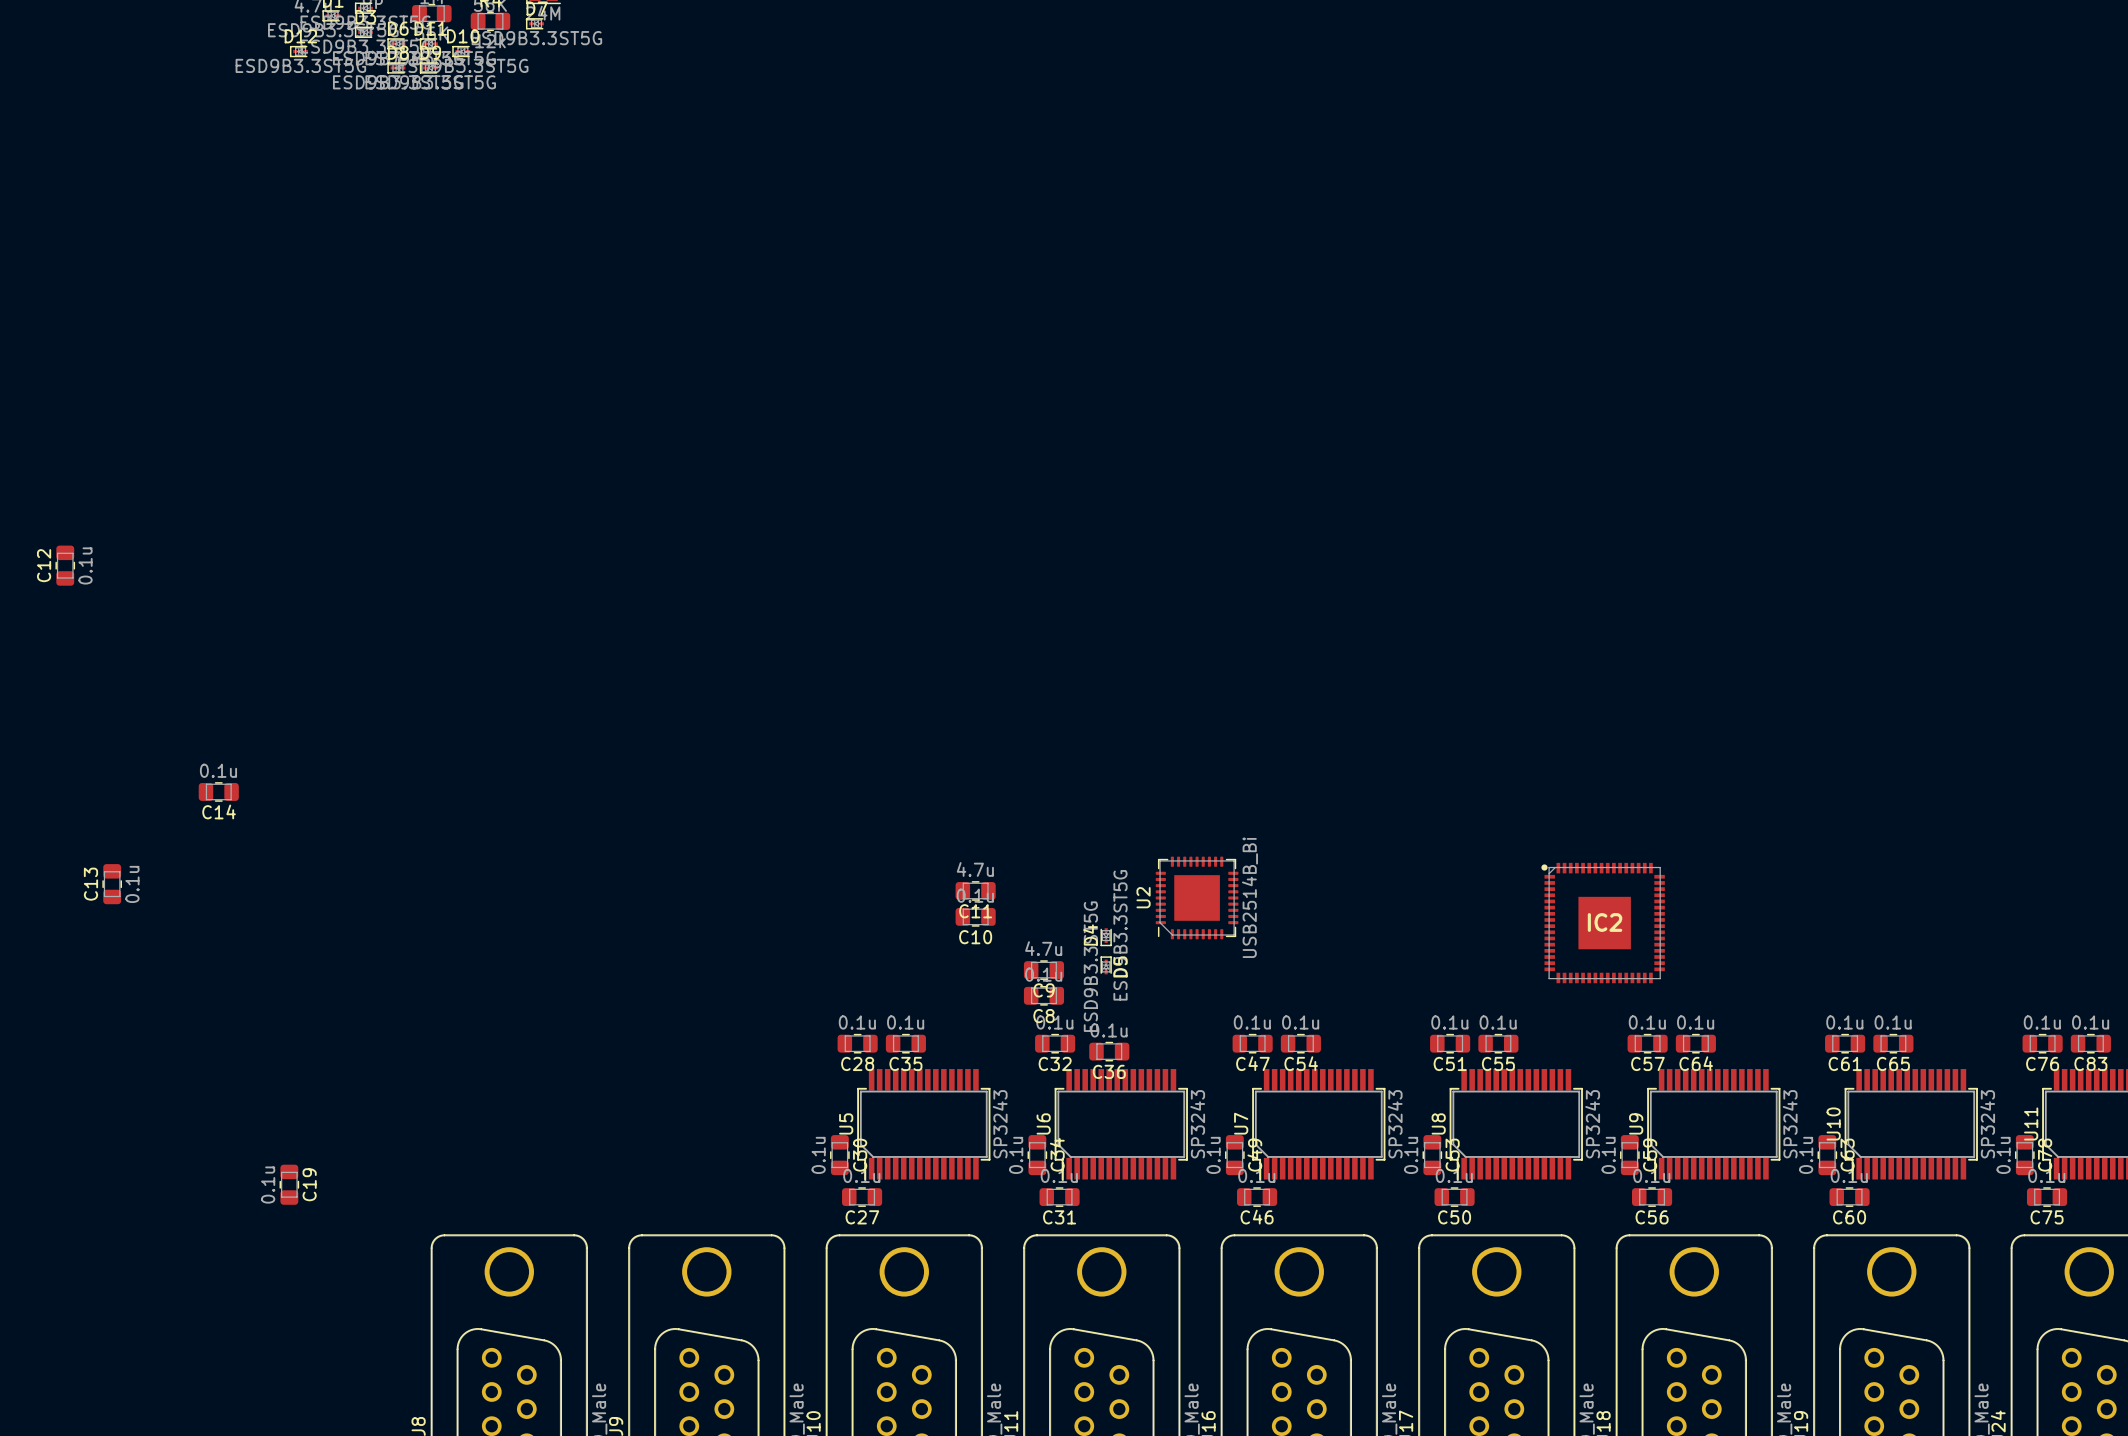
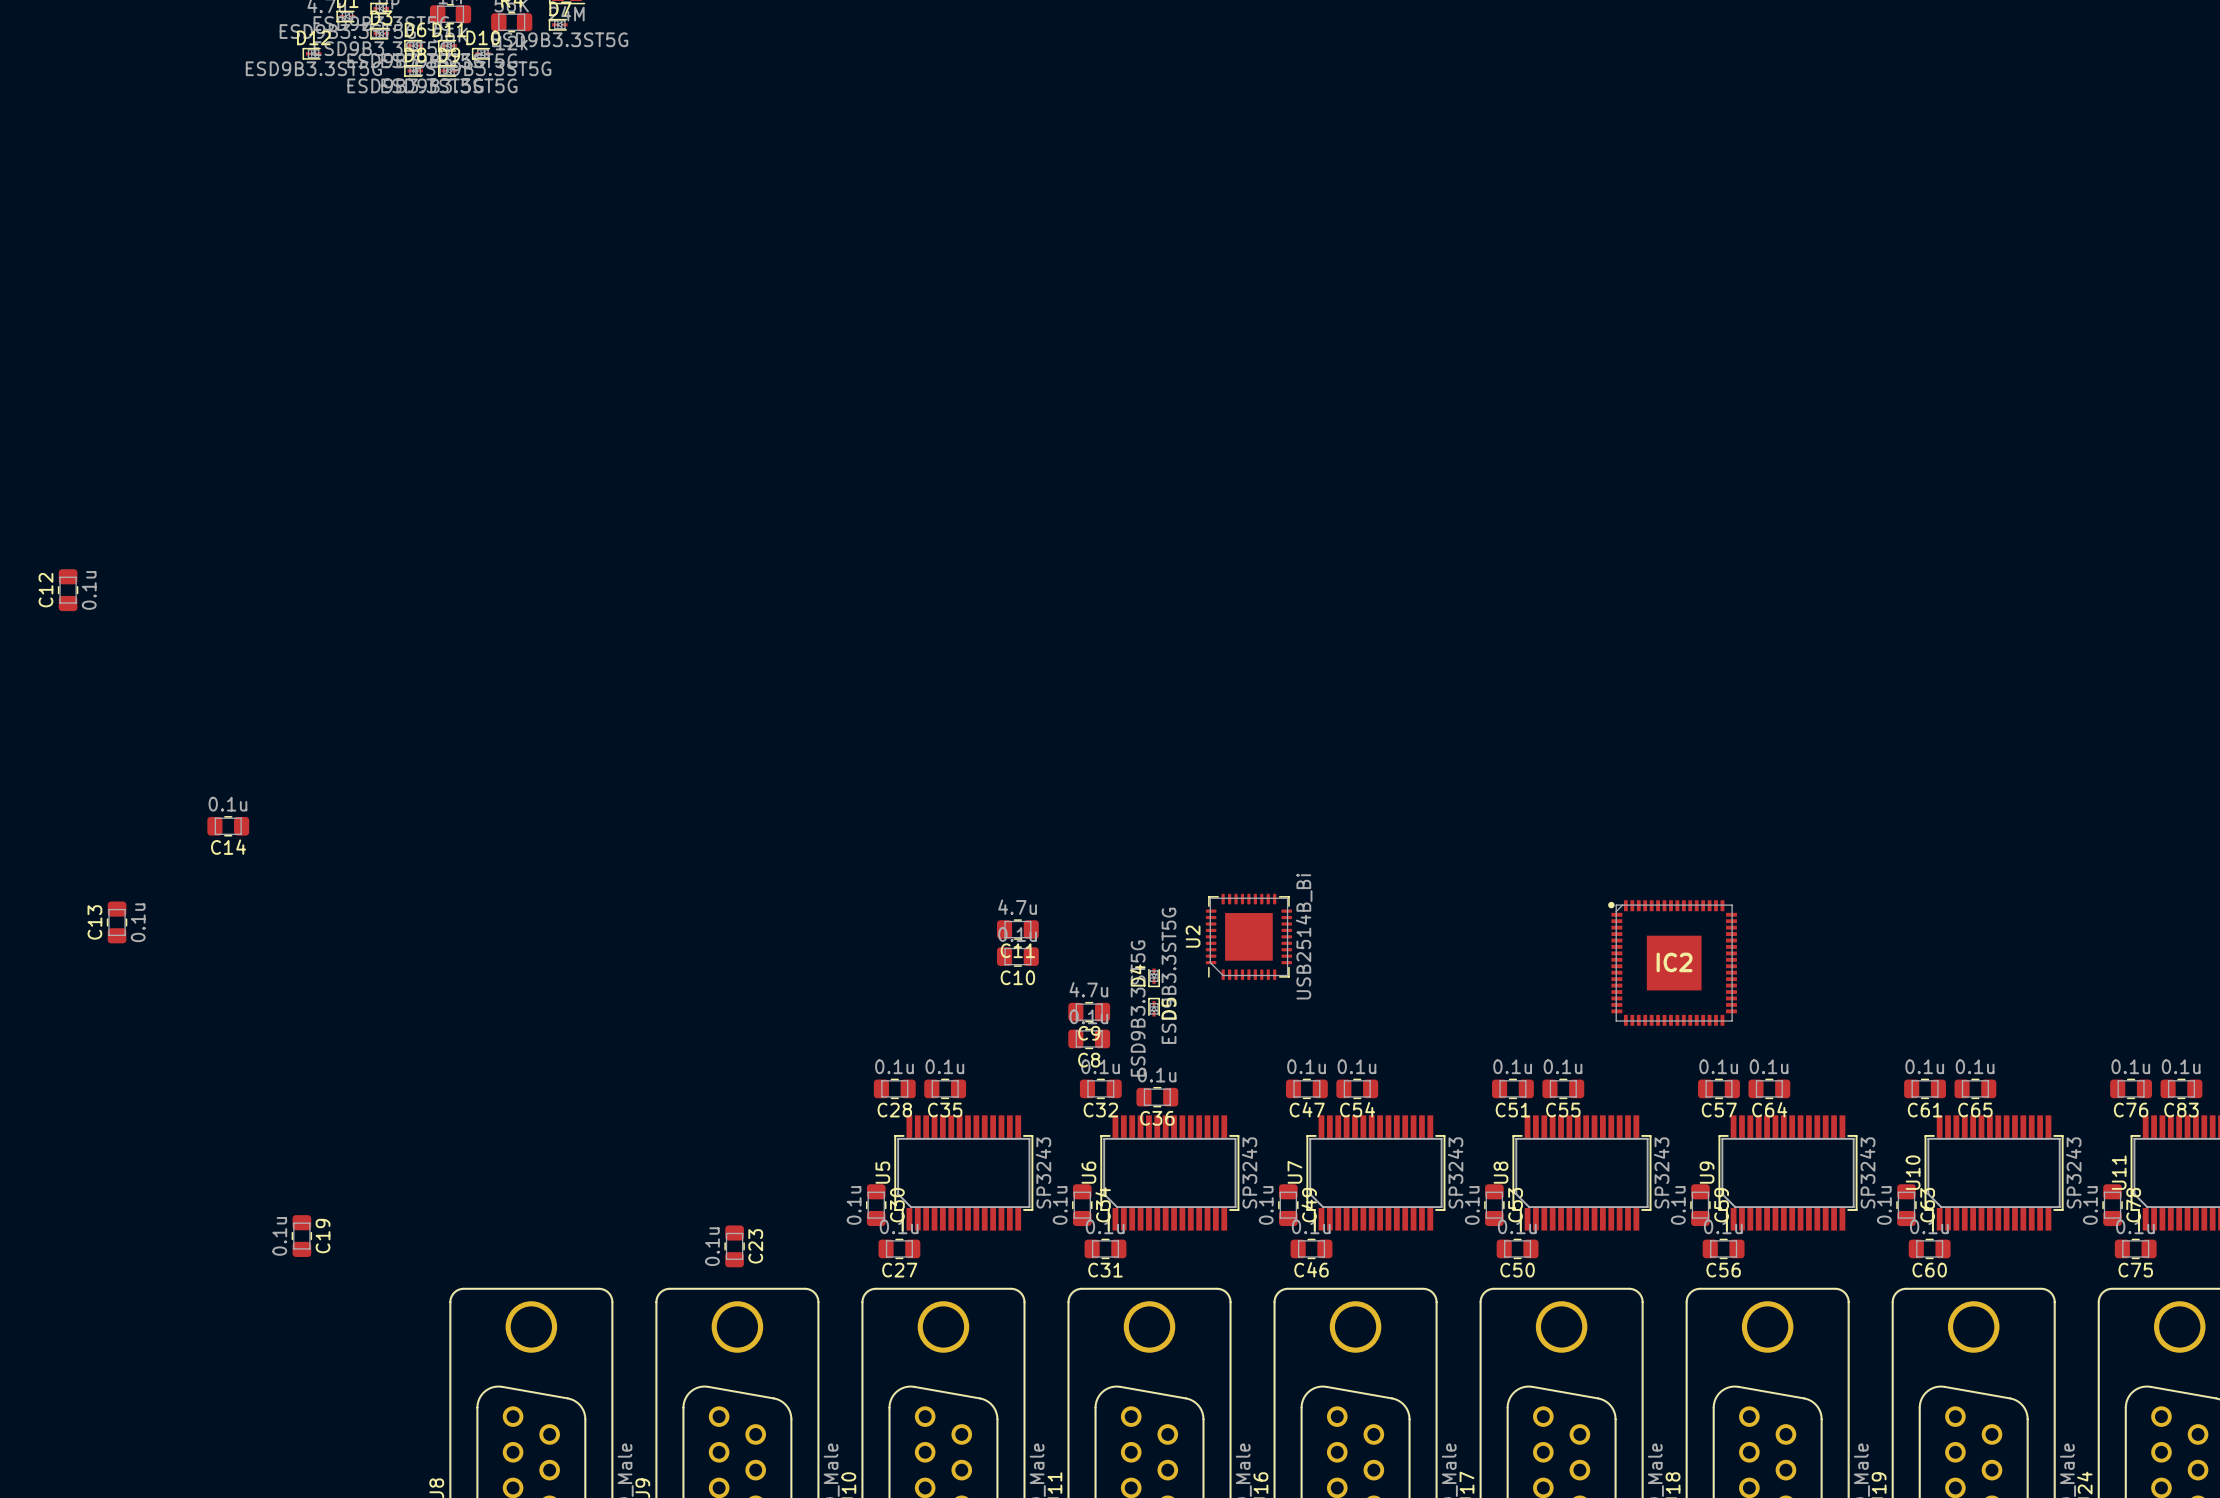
C23: none -> 0.1u (734, 1246)

